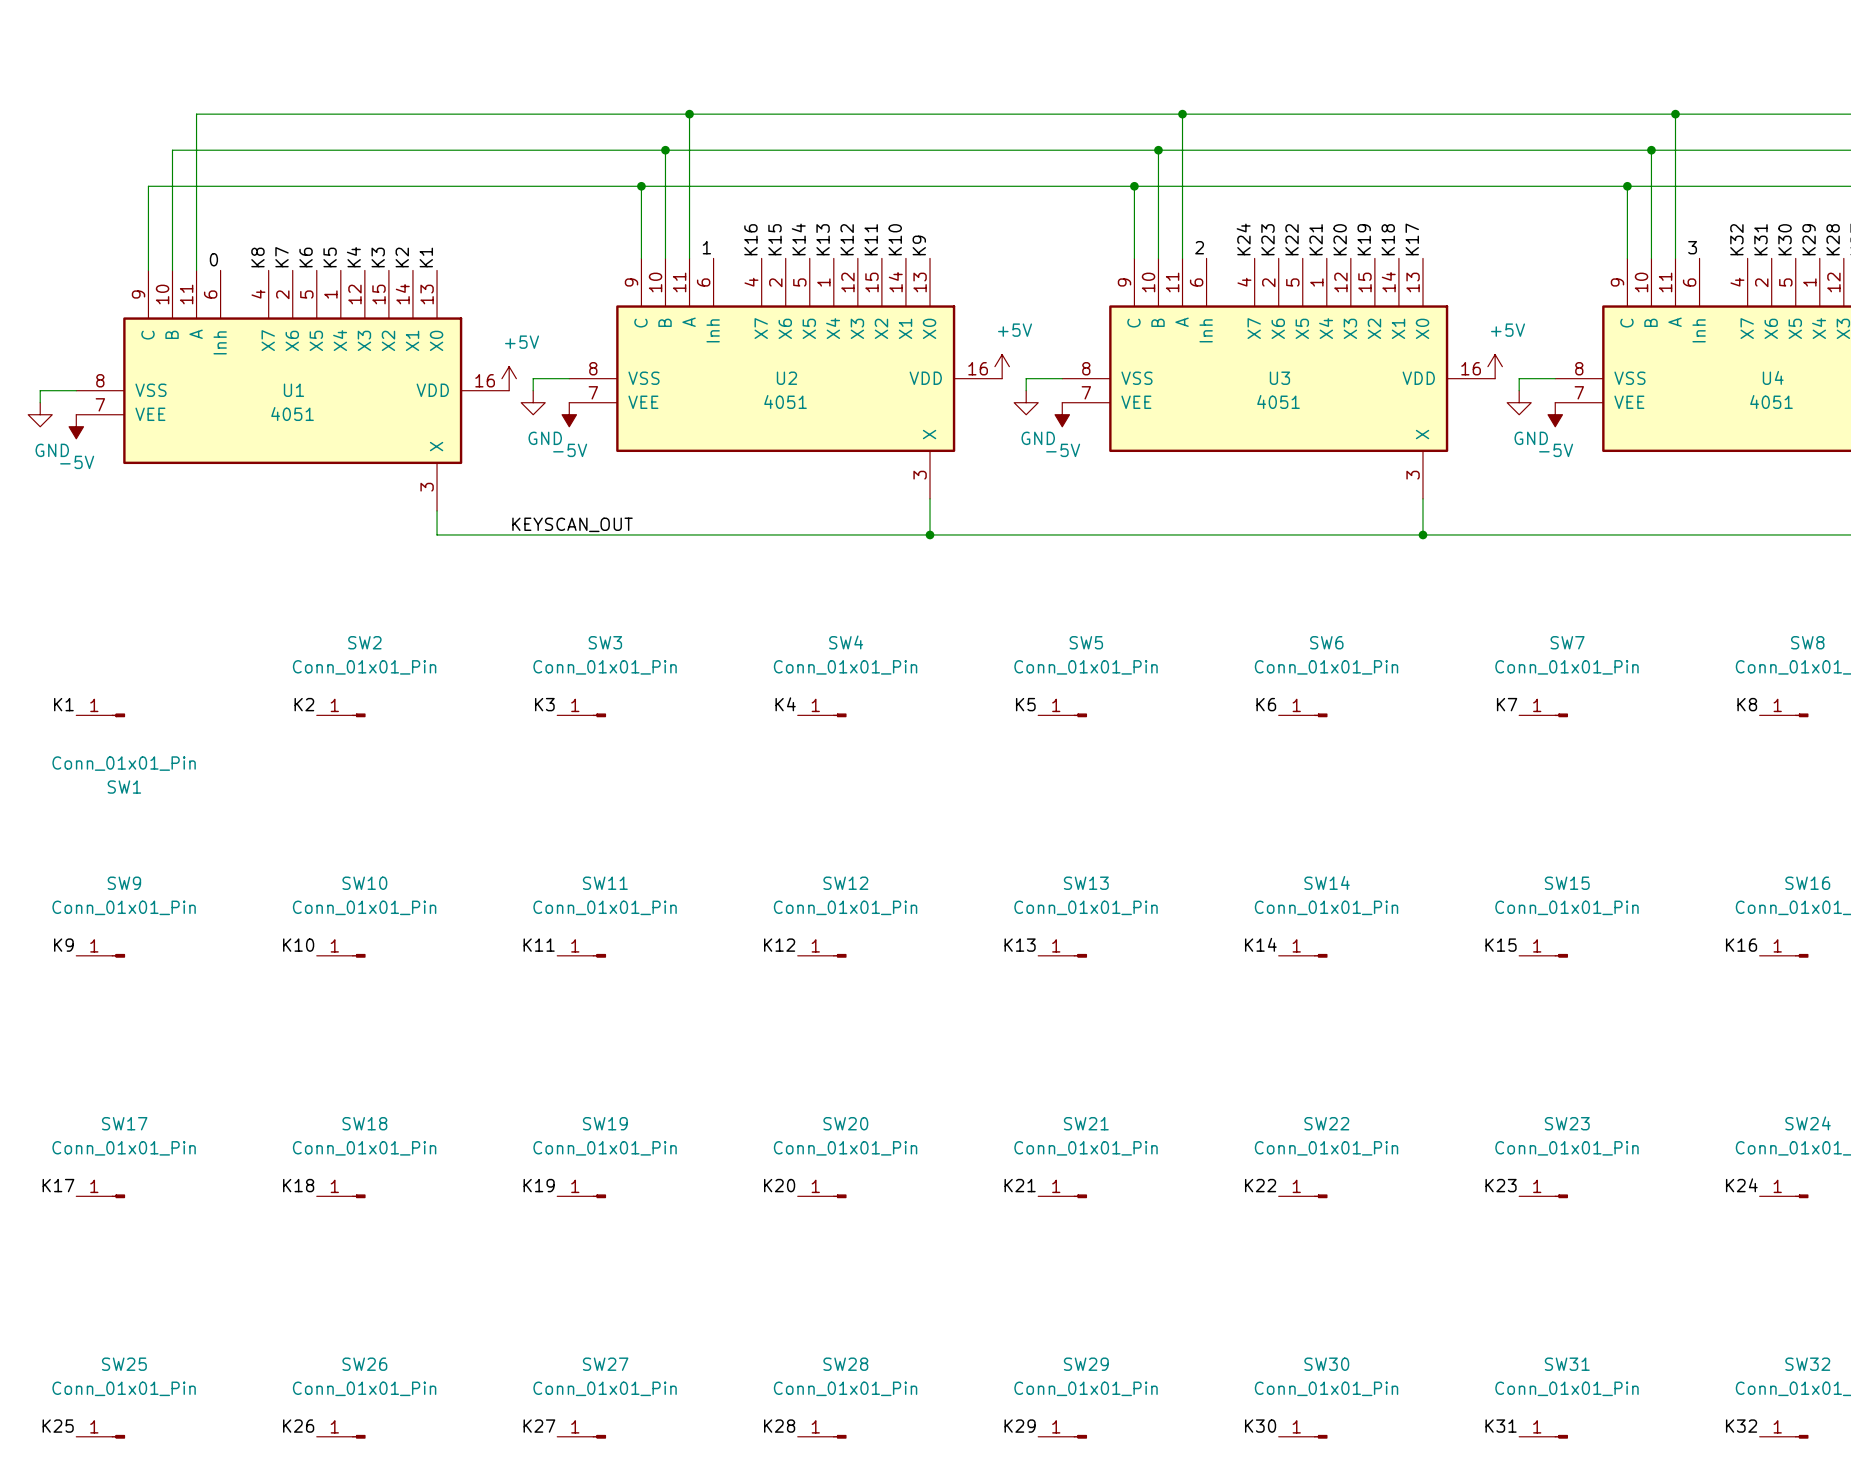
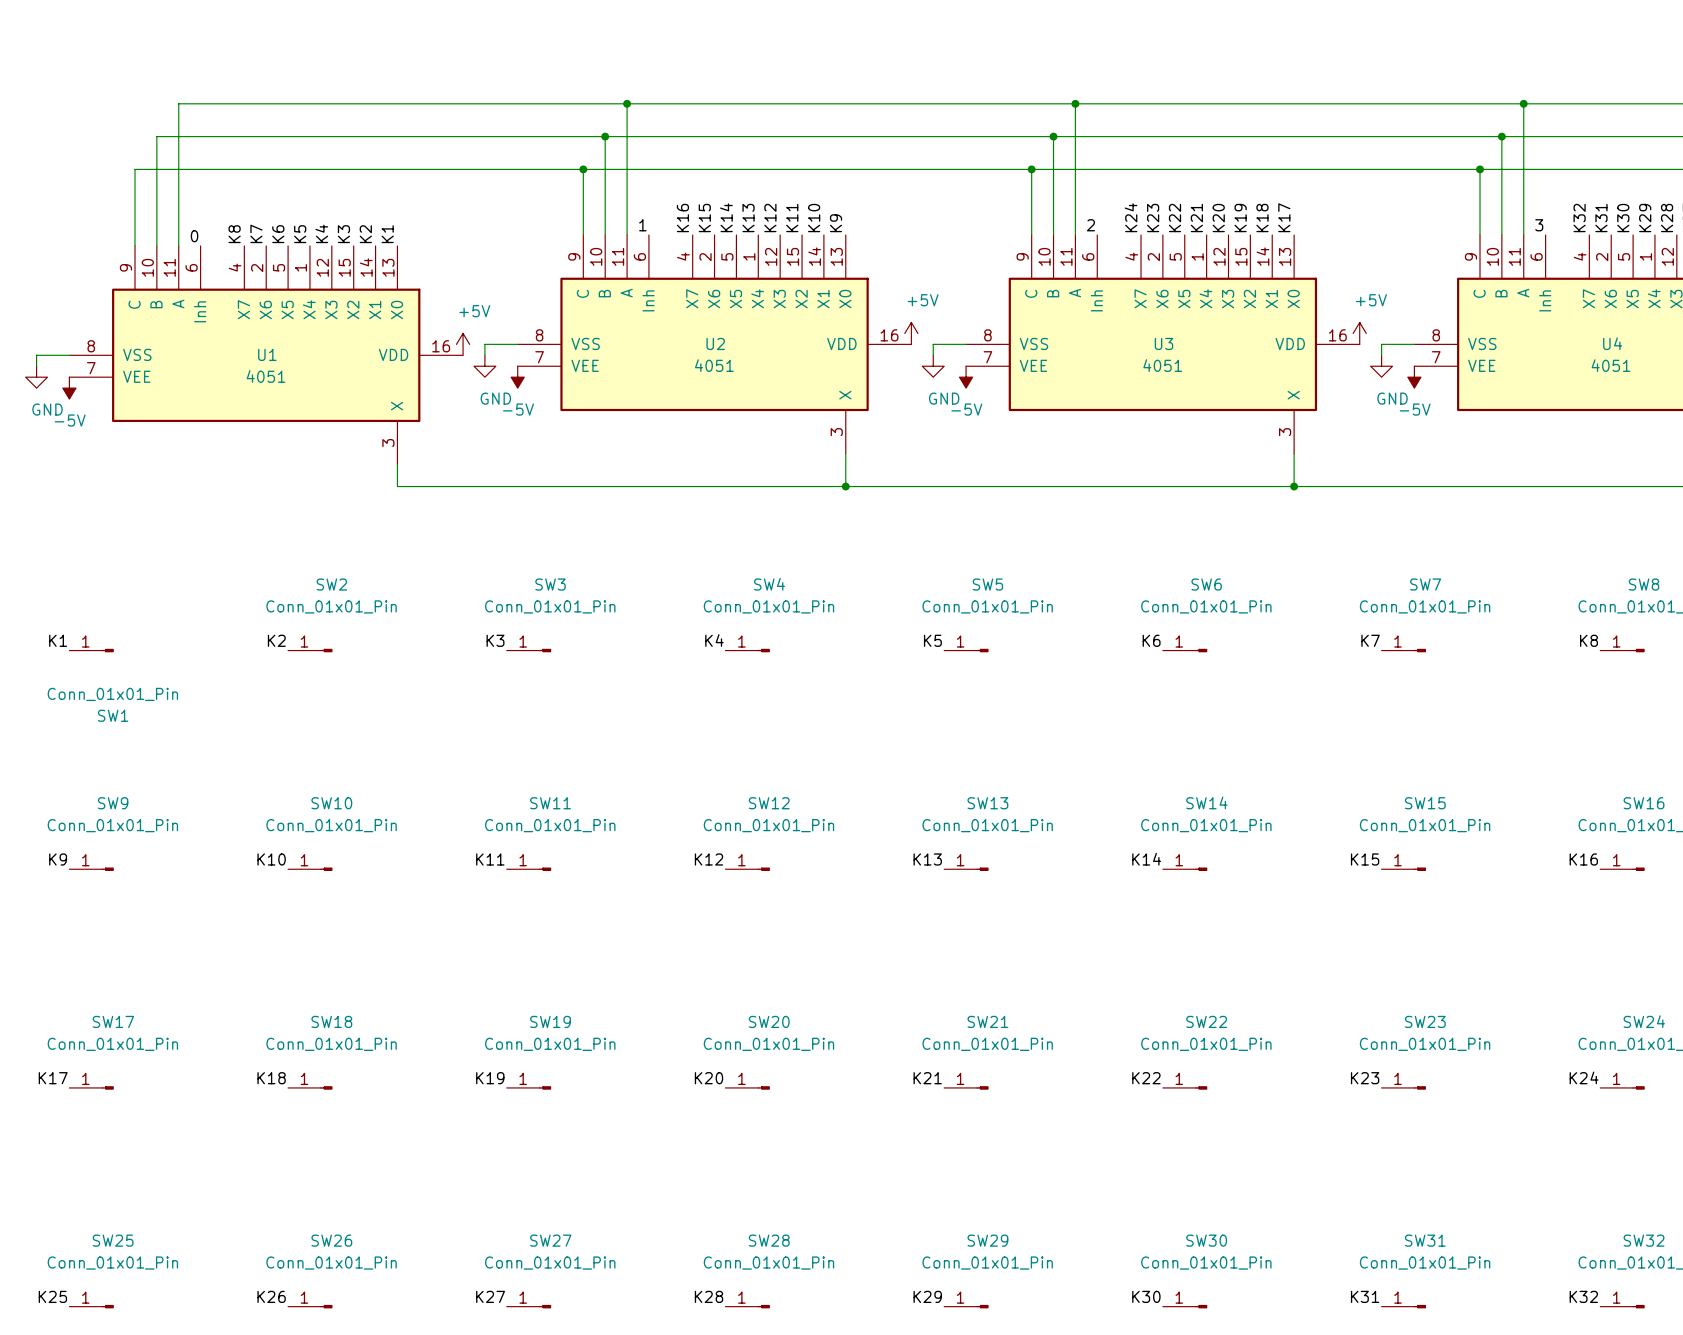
label: KEYSCAN_OUT (572, 524) -> none

